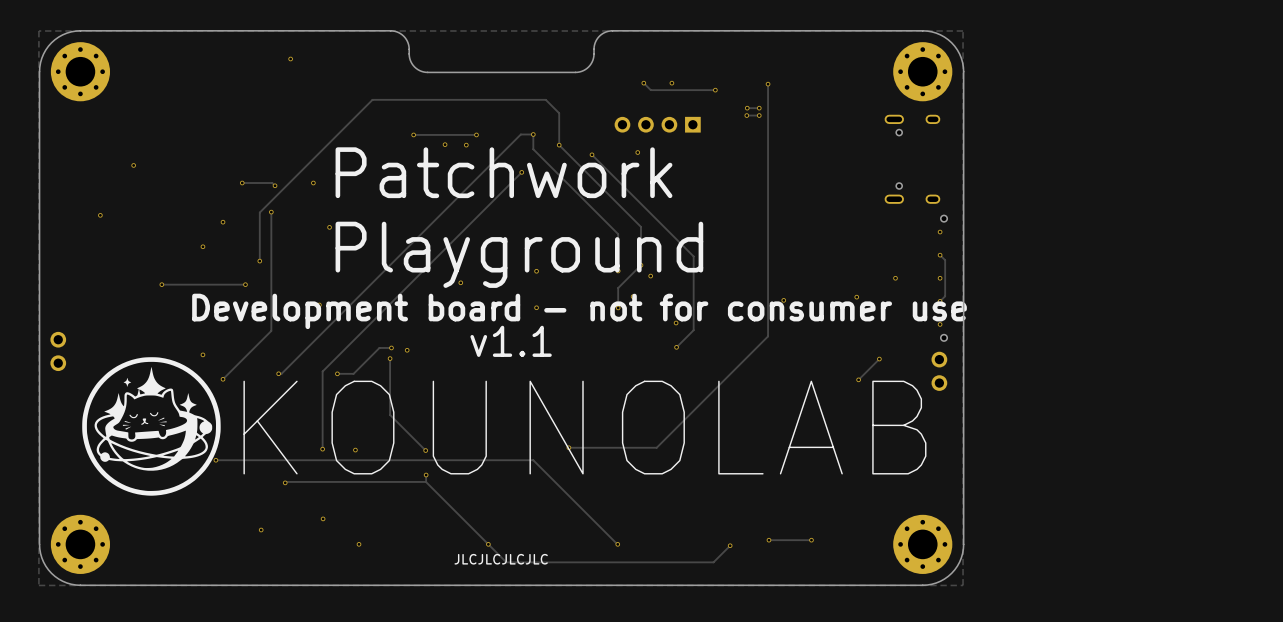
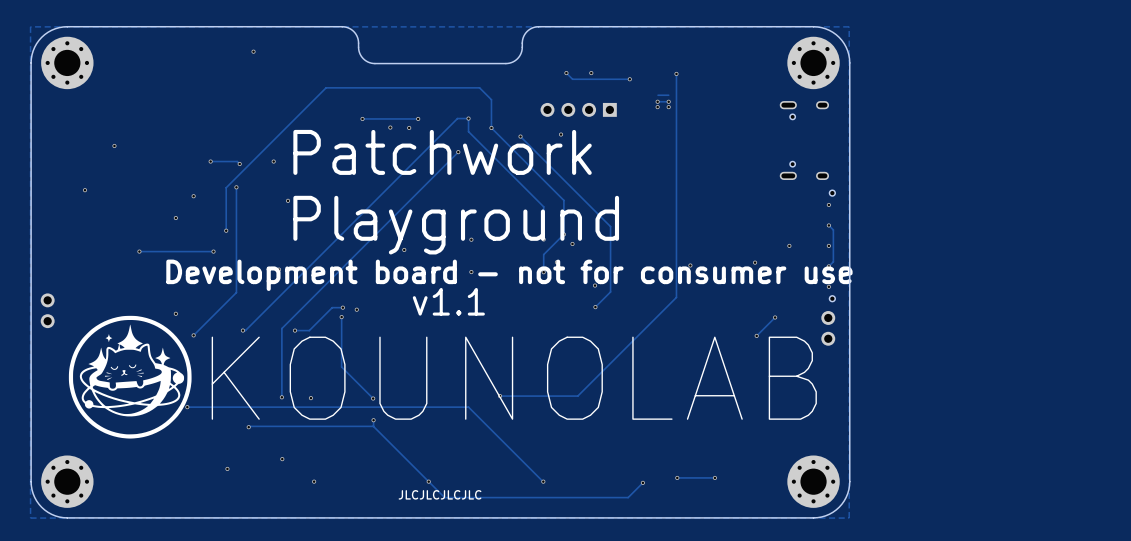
via: (747, 108) -> none
via: (759, 108) -> none
via: none -> (657, 107)
via: none -> (668, 107)

